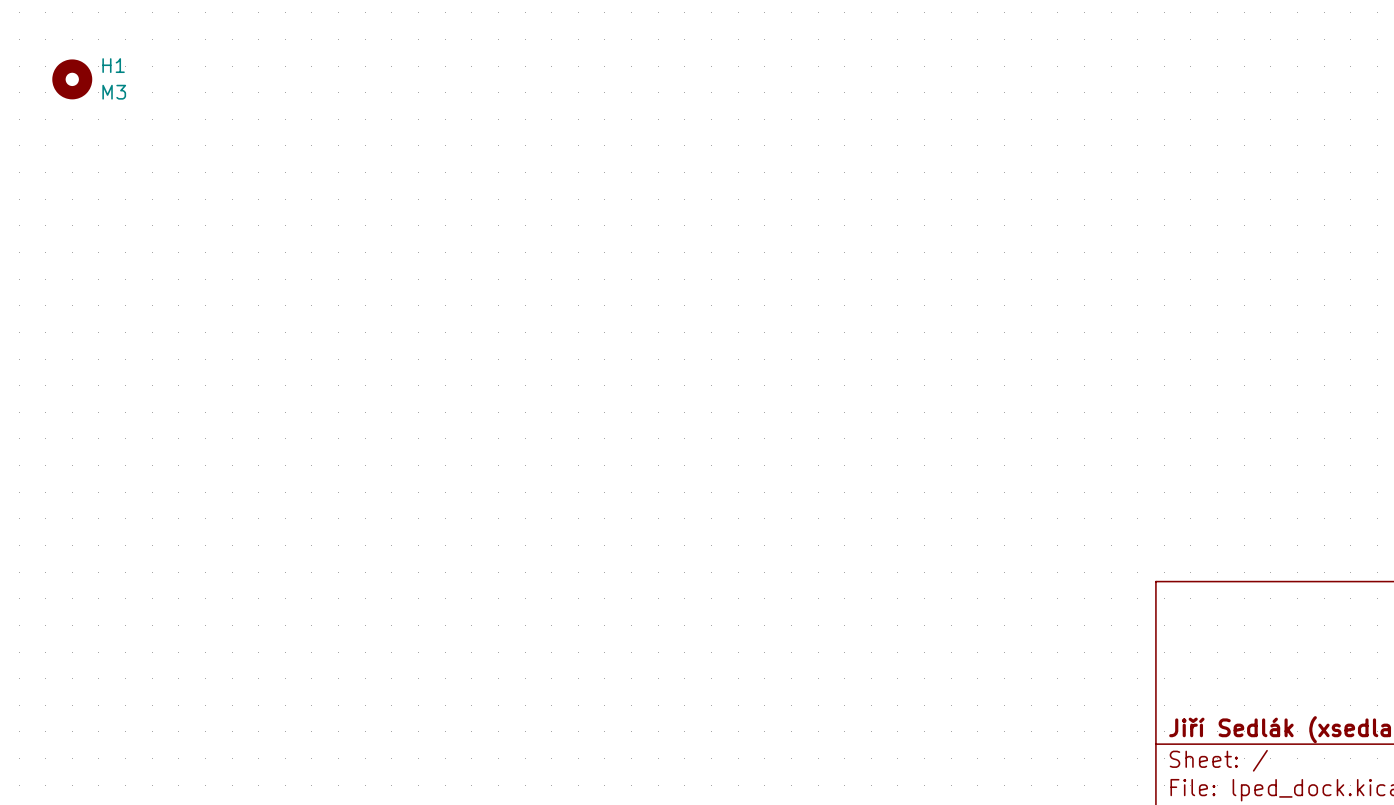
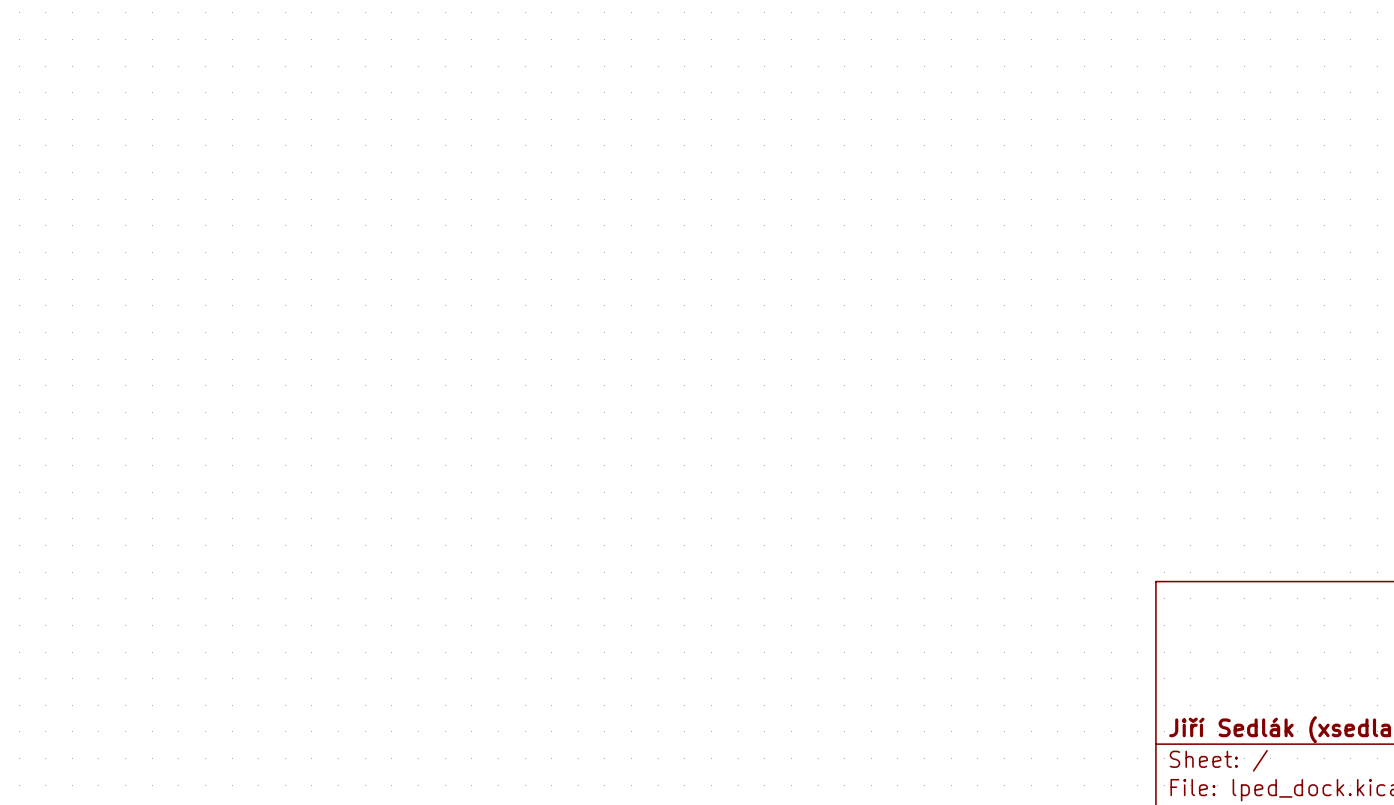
H1: M3 (72, 79) -> none

